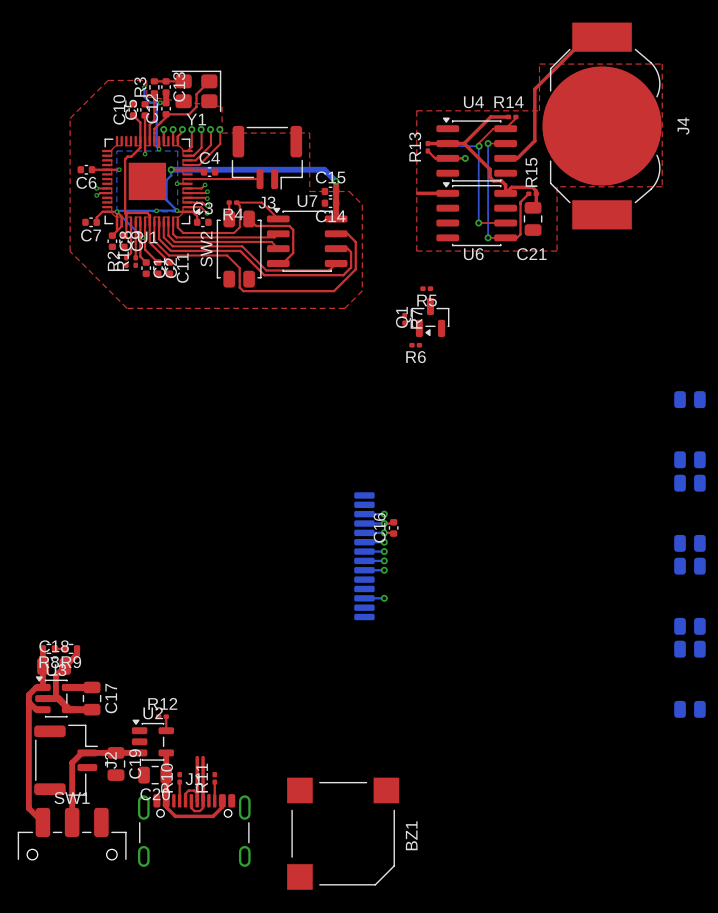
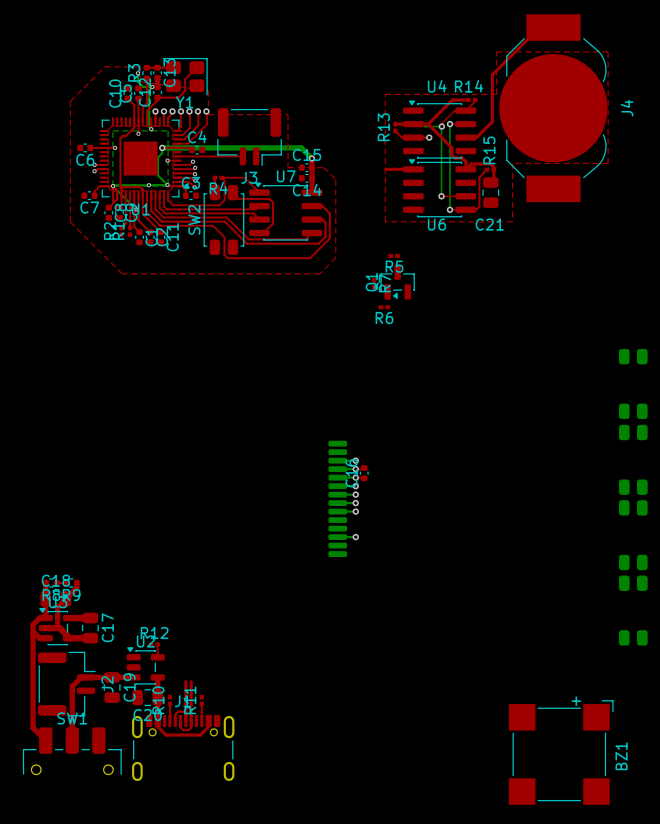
BZ1 footprint: [287, 777, 400, 890] -> [508, 700, 614, 805]

